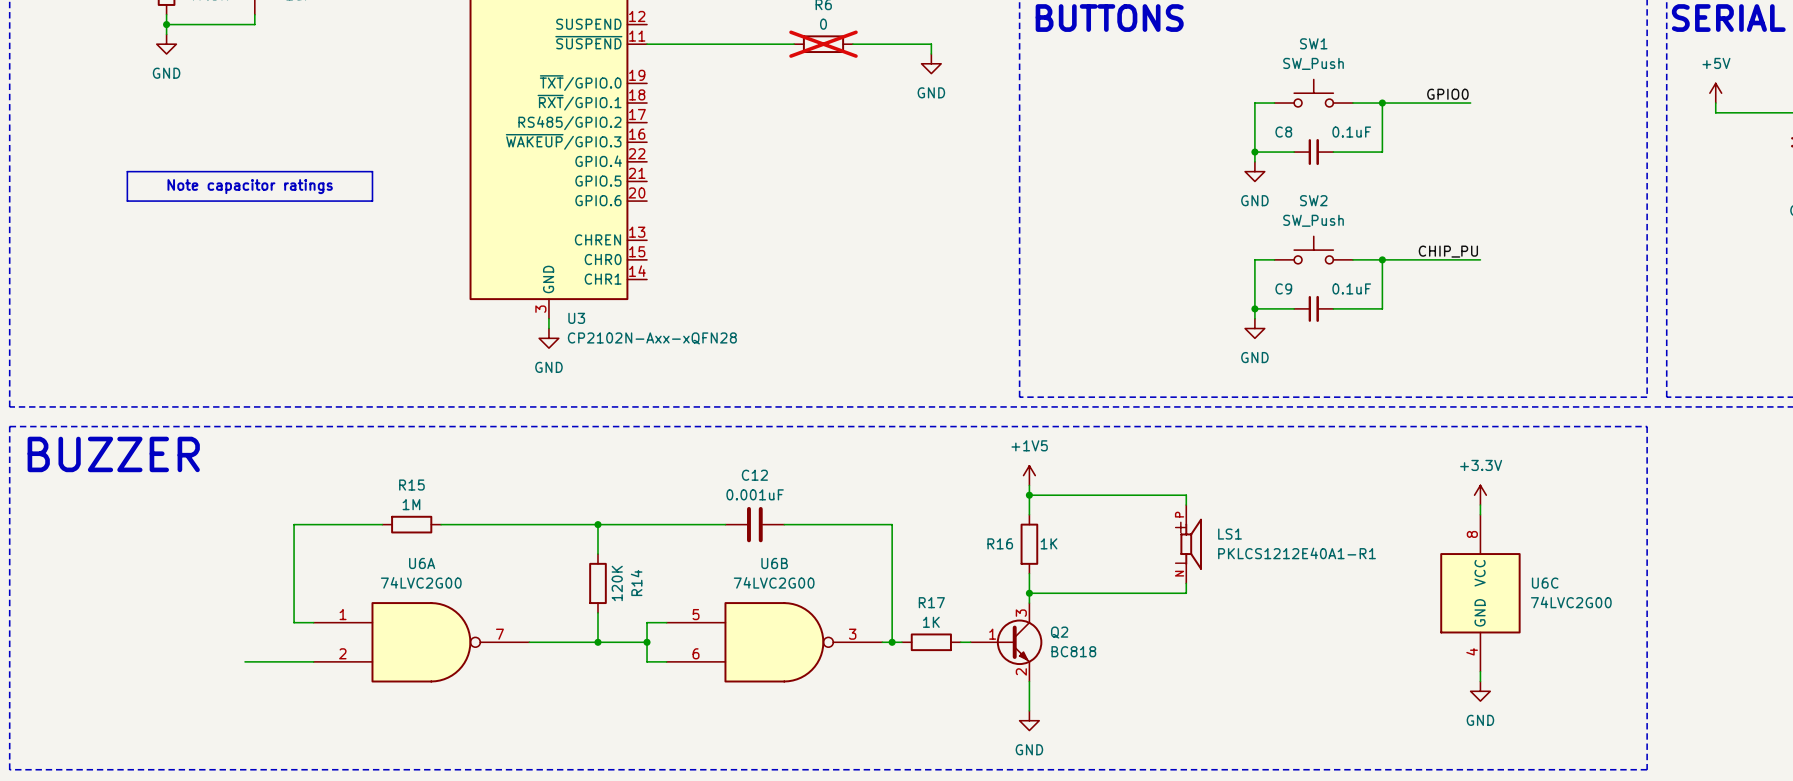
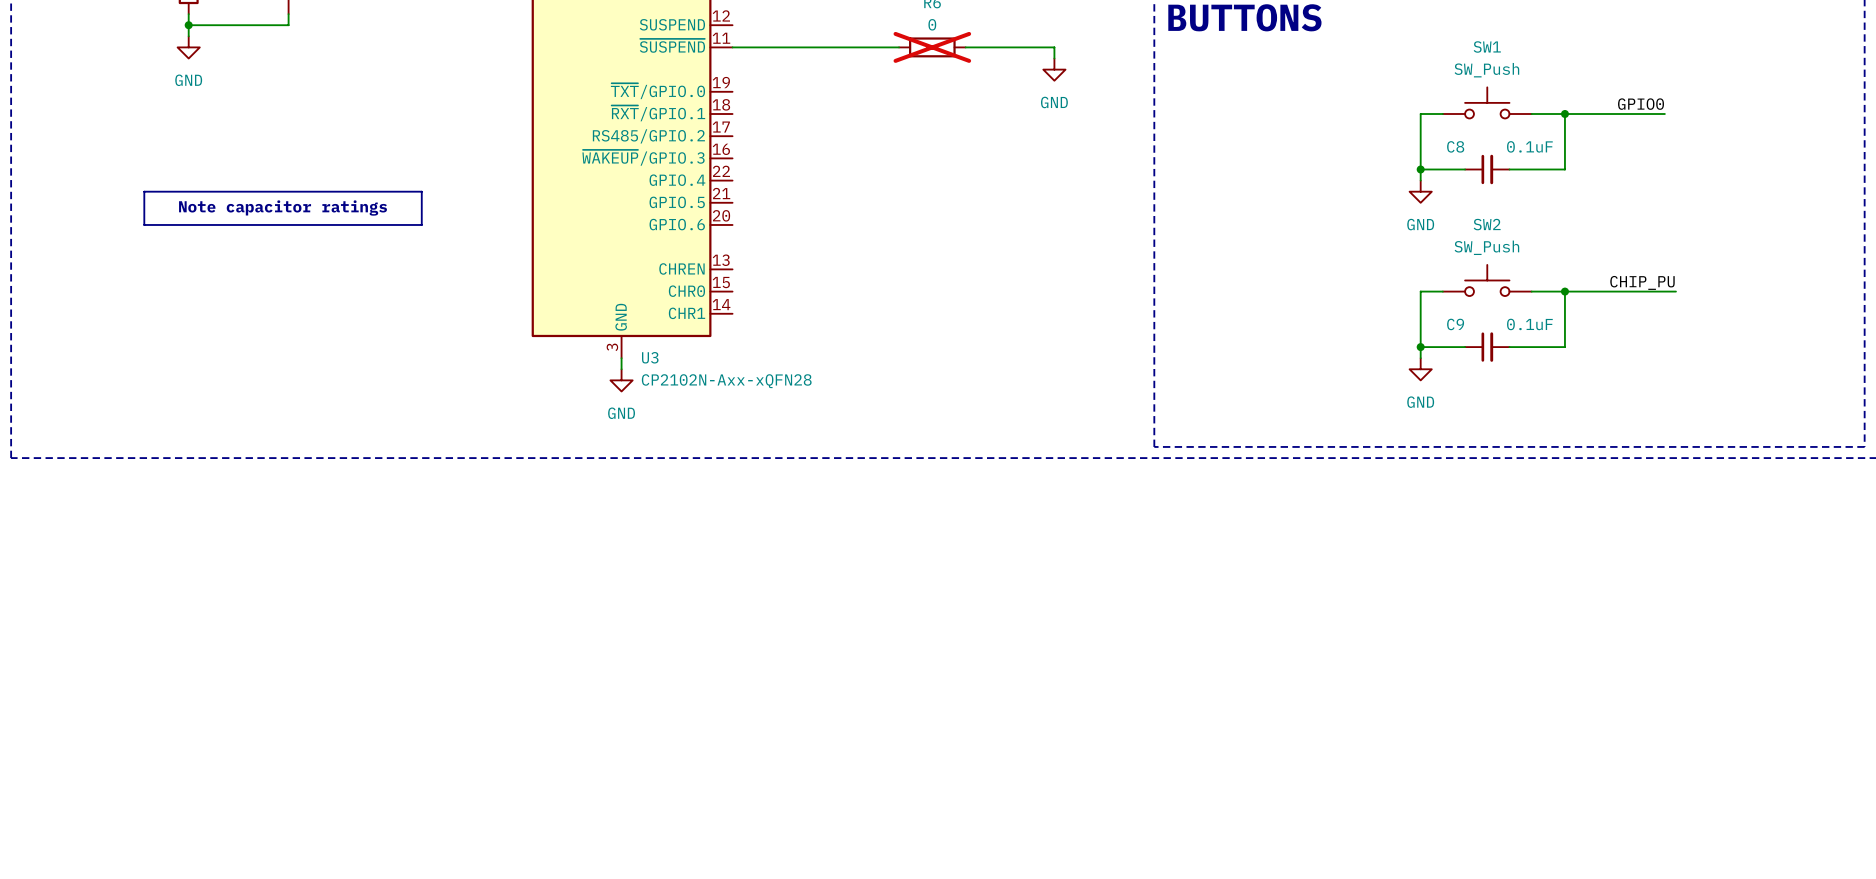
line: (9, 426) (1647, 426) (1647, 769) (9, 769) (9, 426) -> none
text: BUZZER (113, 454) -> none
power symbol: +1V5 (1029, 475) -> none
wire: (1029, 485) (1029, 514) -> none
wire: (1029, 495) (1186, 495) (1186, 505) -> none
junction: (1029, 495) -> none
power symbol: +3.3V (1480, 495) -> none
wire: (1480, 505) (1480, 514) -> none
wire: (382, 524) (294, 524) (294, 622) (313, 622) -> none
R15: 1M (411, 524) -> none
wire: (441, 524) (725, 524) -> none
wire: (597, 524) (597, 554) -> none
junction: (597, 524) -> none
C12: 0.001uF (754, 524) -> none
wire: (784, 524) (892, 524) (892, 642) -> none
R16: 1K (1029, 544) -> none
LS1: PKLCS1212E40A1-R1 (1191, 544) -> none
wire: (1029, 573) (1029, 603) -> none
R14: 120K (597, 583) -> none
wire: (1186, 583) (1186, 593) (1029, 593) -> none
junction: (1029, 593) -> none
U6C: 74LVC2G00 (1480, 593) -> none
wire: (597, 612) (597, 642) -> none
wire: (666, 622) (647, 622) (647, 661) (666, 661) -> none
U6A: 74LVC2G00 (421, 642) -> none
wire: (529, 642) (647, 642) -> none
junction: (597, 642) -> none
junction: (647, 642) -> none
U6B: 74LVC2G00 (774, 642) -> none
wire: (882, 642) (901, 642) -> none
junction: (892, 642) -> none
R17: 1K (931, 642) -> none
wire: (960, 642) (970, 642) -> none
Q2: BC818 (1006, 642) -> none
wire: (245, 661) (313, 661) -> none
wire: (1480, 671) (1480, 681) -> none
wire: (1029, 681) (1029, 710) -> none
power symbol: GND (1480, 691) -> none
power symbol: GND (1029, 720) -> none

